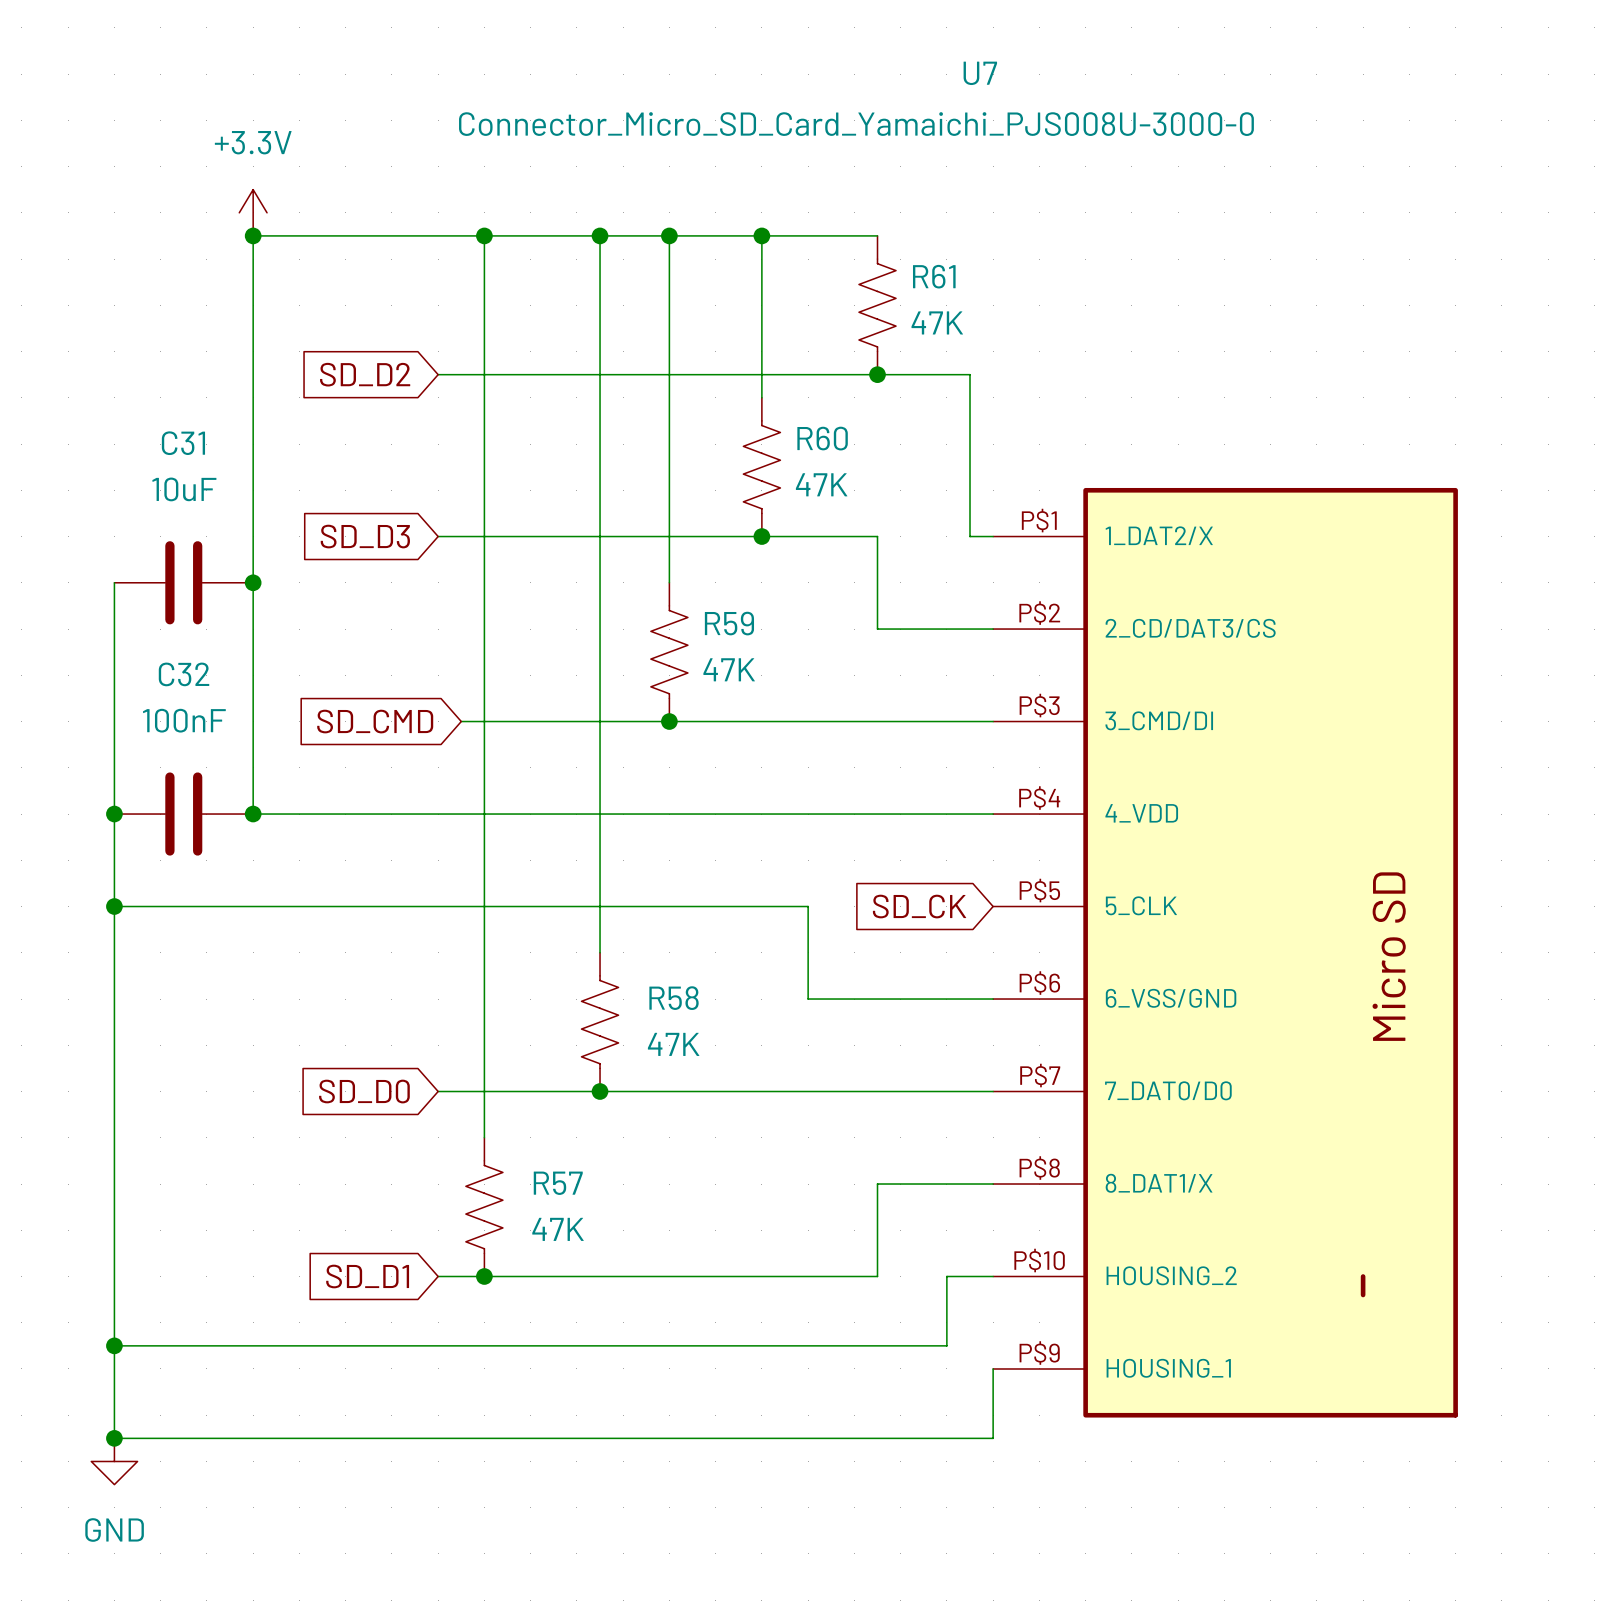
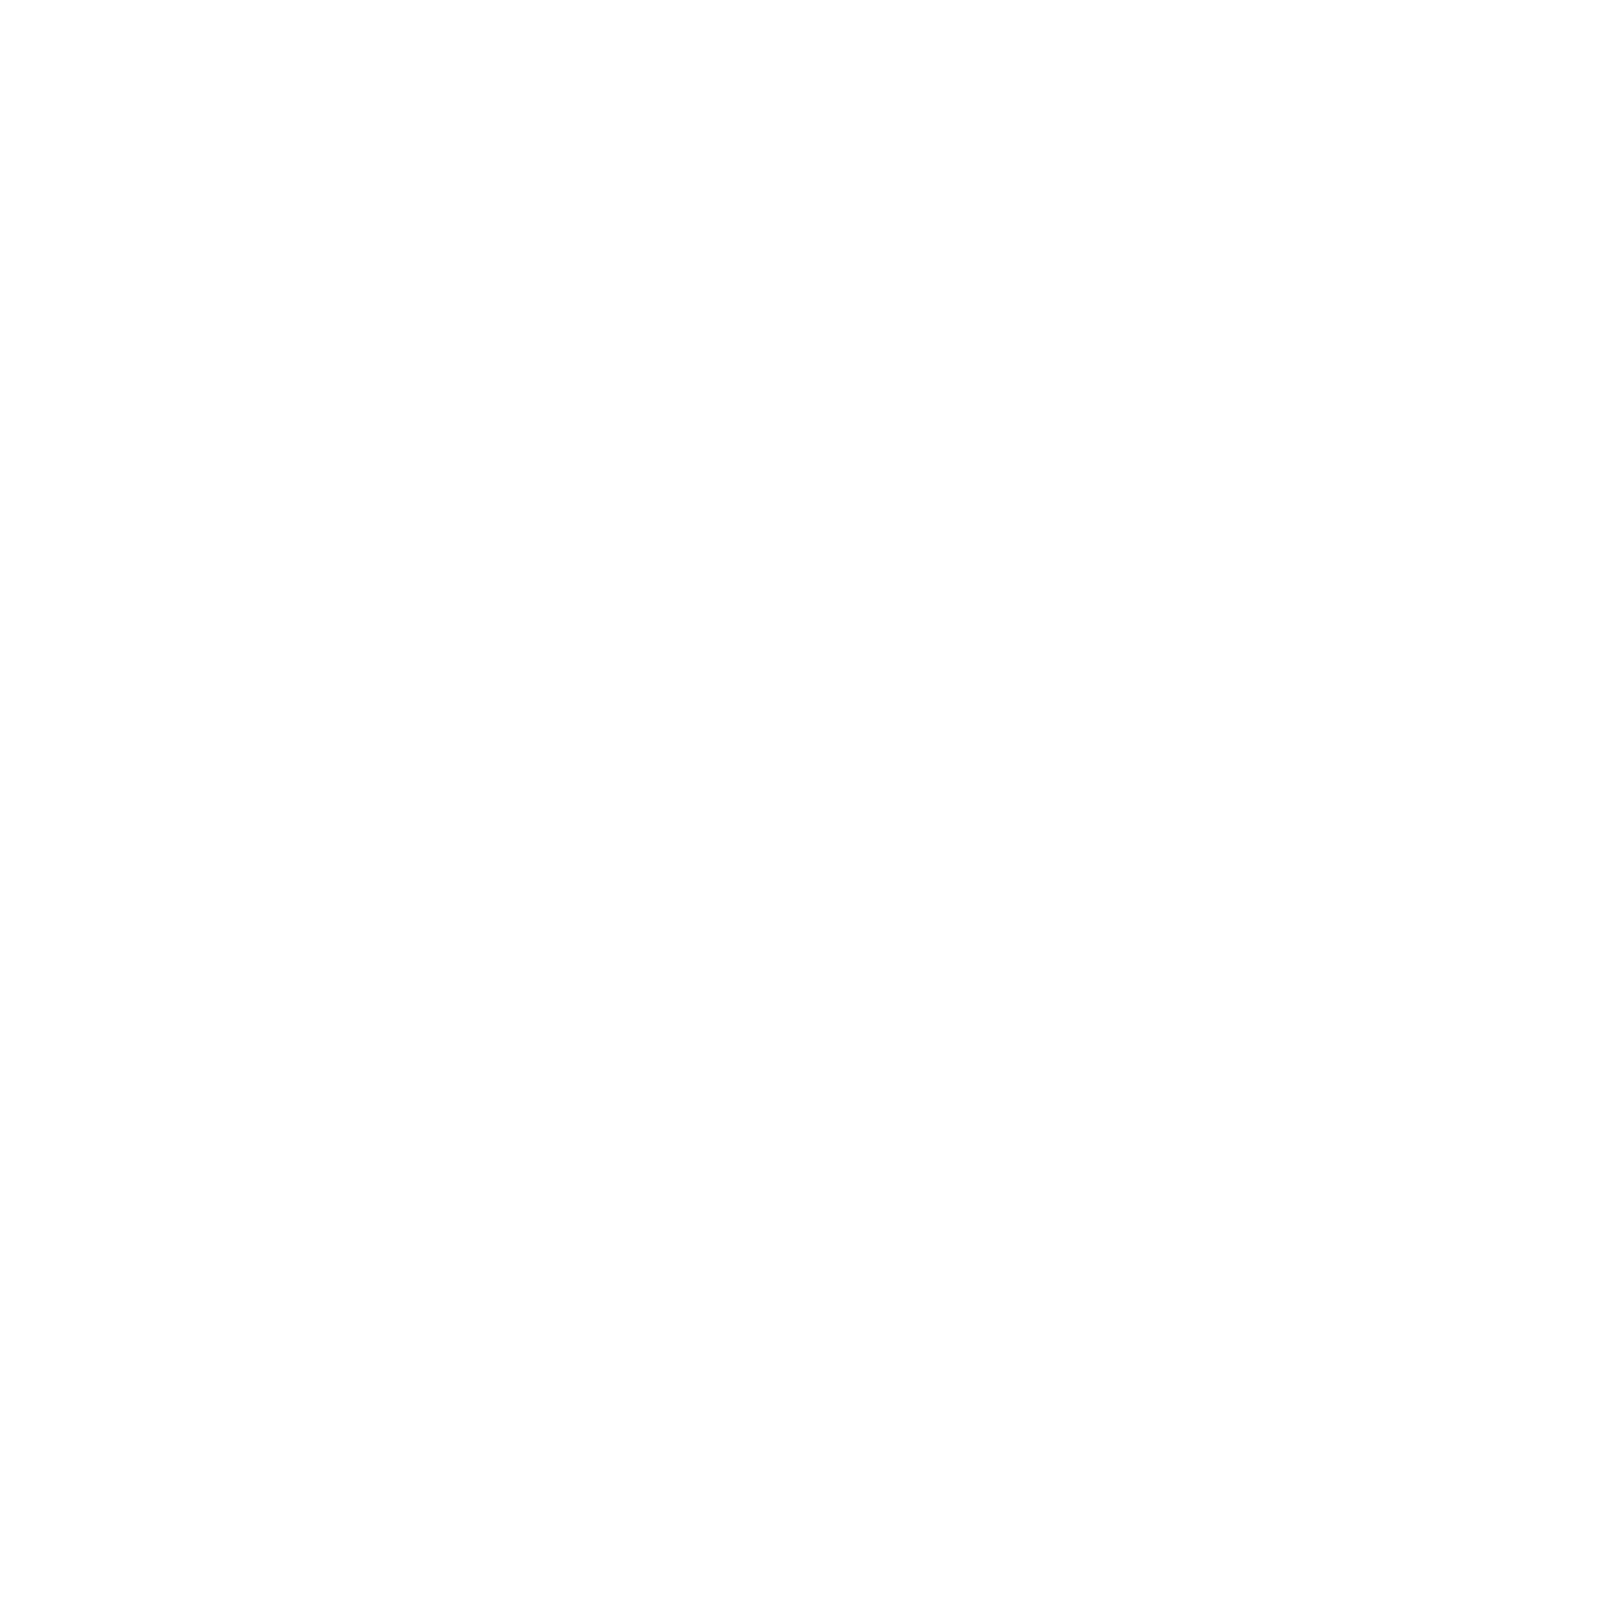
power symbol: +3.3V (253, 212) -> none
junction: (253, 235) -> none
wire: (484, 235) (484, 1137) -> none
junction: (484, 235) -> none
wire: (600, 235) (600, 952) -> none
junction: (600, 235) -> none
wire: (669, 235) (669, 582) -> none
junction: (669, 235) -> none
wire: (761, 235) (761, 397) -> none
junction: (761, 235) -> none
wire: (877, 235) (253, 235) (253, 814) (993, 814) -> none
R61: 47K (877, 305) -> none
global label: SD_D2 (365, 374) -> none
wire: (438, 374) (970, 374) (970, 536) (993, 536) -> none
junction: (877, 374) -> none
R60: 47K (761, 467) -> none
global label: SD_D3 (365, 536) -> none
wire: (438, 536) (877, 536) (877, 629) (993, 629) -> none
junction: (761, 536) -> none
wire: (114, 582) (114, 1438) (993, 1438) (993, 1368) -> none
C31: 10uF (183, 582) -> none
junction: (253, 582) -> none
R59: 47K (669, 652) -> none
global label: SD_CMD (375, 721) -> none
wire: (461, 721) (993, 721) -> none
junction: (669, 721) -> none
junction: (114, 814) -> none
C32: 100nF (183, 814) -> none
junction: (253, 814) -> none
wire: (114, 906) (808, 906) (808, 999) (993, 999) -> none
junction: (114, 906) -> none
global label: SD_CK (919, 906) -> none
U7: Connector_Micro_SD_Card_Yamaichi_PJS008U-3000-0 (1225, 952) -> none
R58: 47K (600, 1022) -> none
global label: SD_D0 (364, 1091) -> none
wire: (438, 1091) (993, 1091) -> none
junction: (600, 1091) -> none
wire: (993, 1184) (877, 1184) (877, 1276) (438, 1276) -> none
R57: 47K (484, 1207) -> none
global label: SD_D1 (367, 1276) -> none
junction: (484, 1276) -> none
wire: (993, 1276) (946, 1276) (946, 1345) (114, 1345) -> none
junction: (114, 1345) -> none
junction: (114, 1438) -> none
power symbol: GND (114, 1461) -> none

